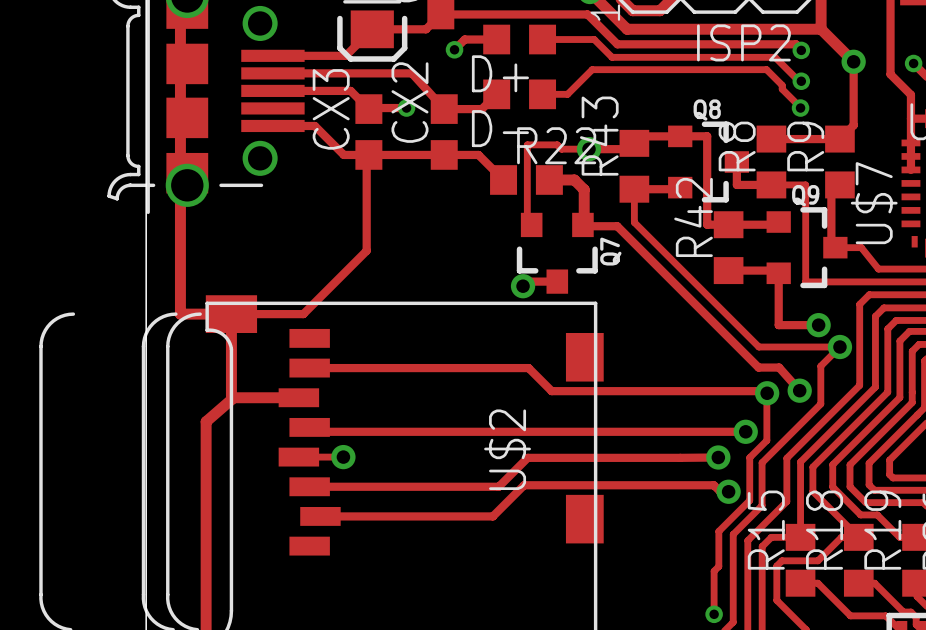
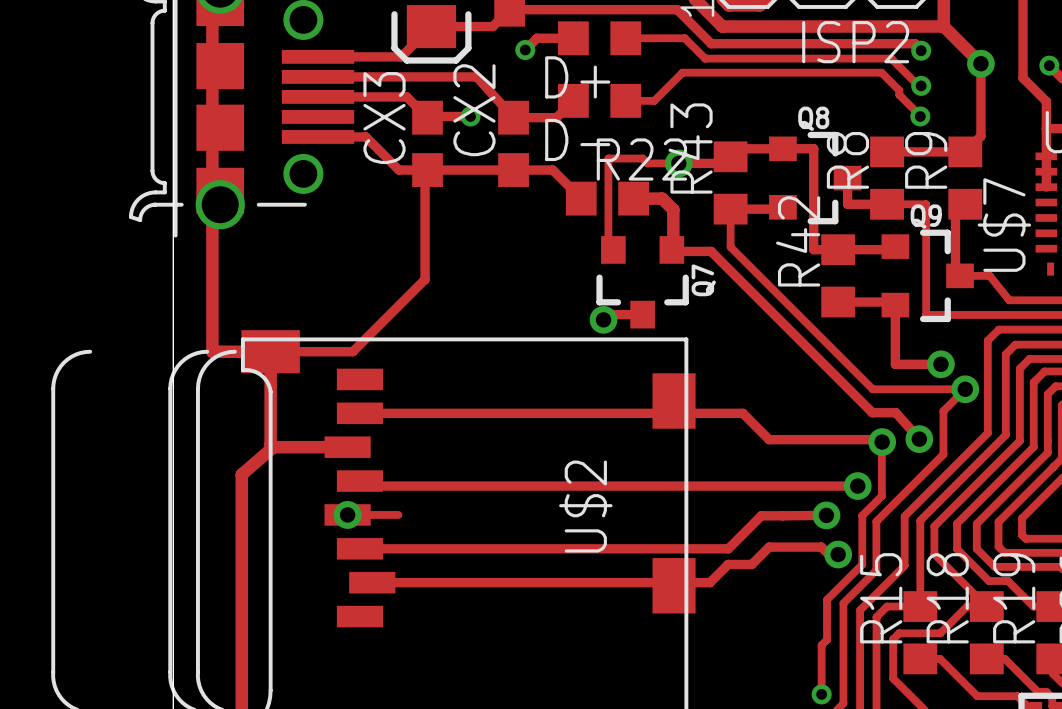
track: (528, 368) (551, 391) (668, 391) -> (609, 413) (742, 413) (769, 439)
via position: (343, 457) -> (347, 514)
track: (661, 457) (527, 457) (498, 486) -> (761, 515) (728, 548) (575, 548)
track: (668, 485) (524, 485) (492, 516) -> (769, 547) (751, 564) (728, 564) (709, 582) (569, 582)

